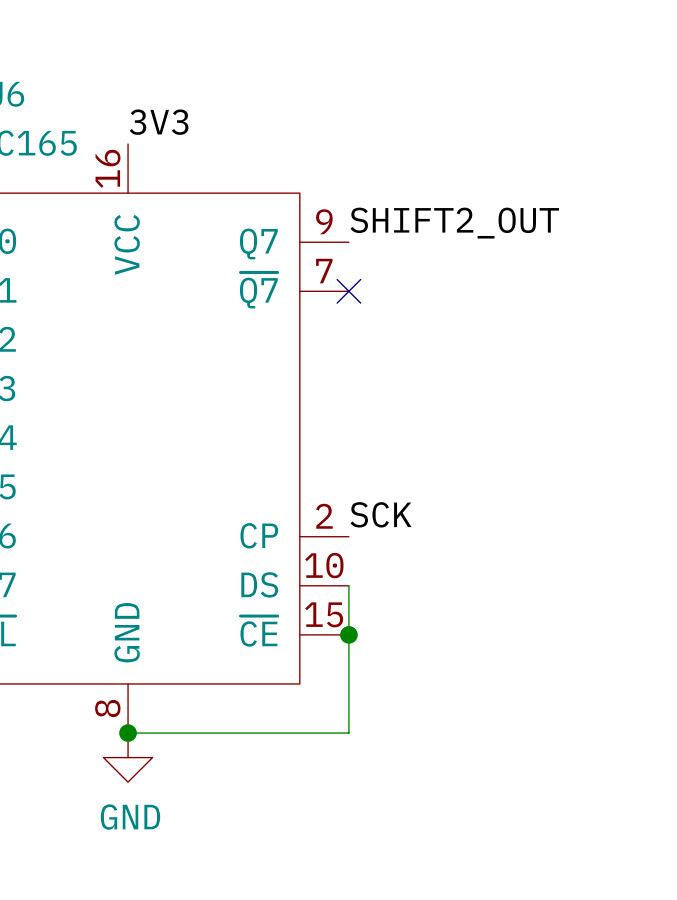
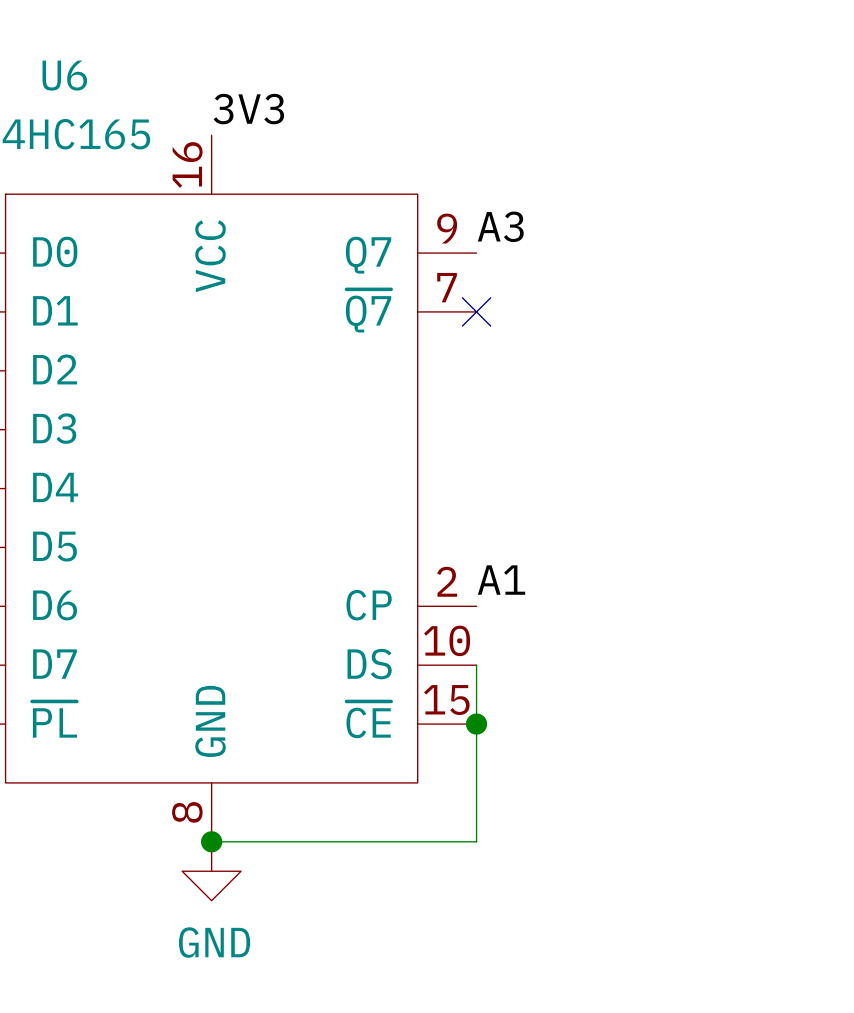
label: SHIFT2_OUT (454, 223) -> A3 (500, 226)
label: SCK (380, 514) -> A1 (501, 580)

